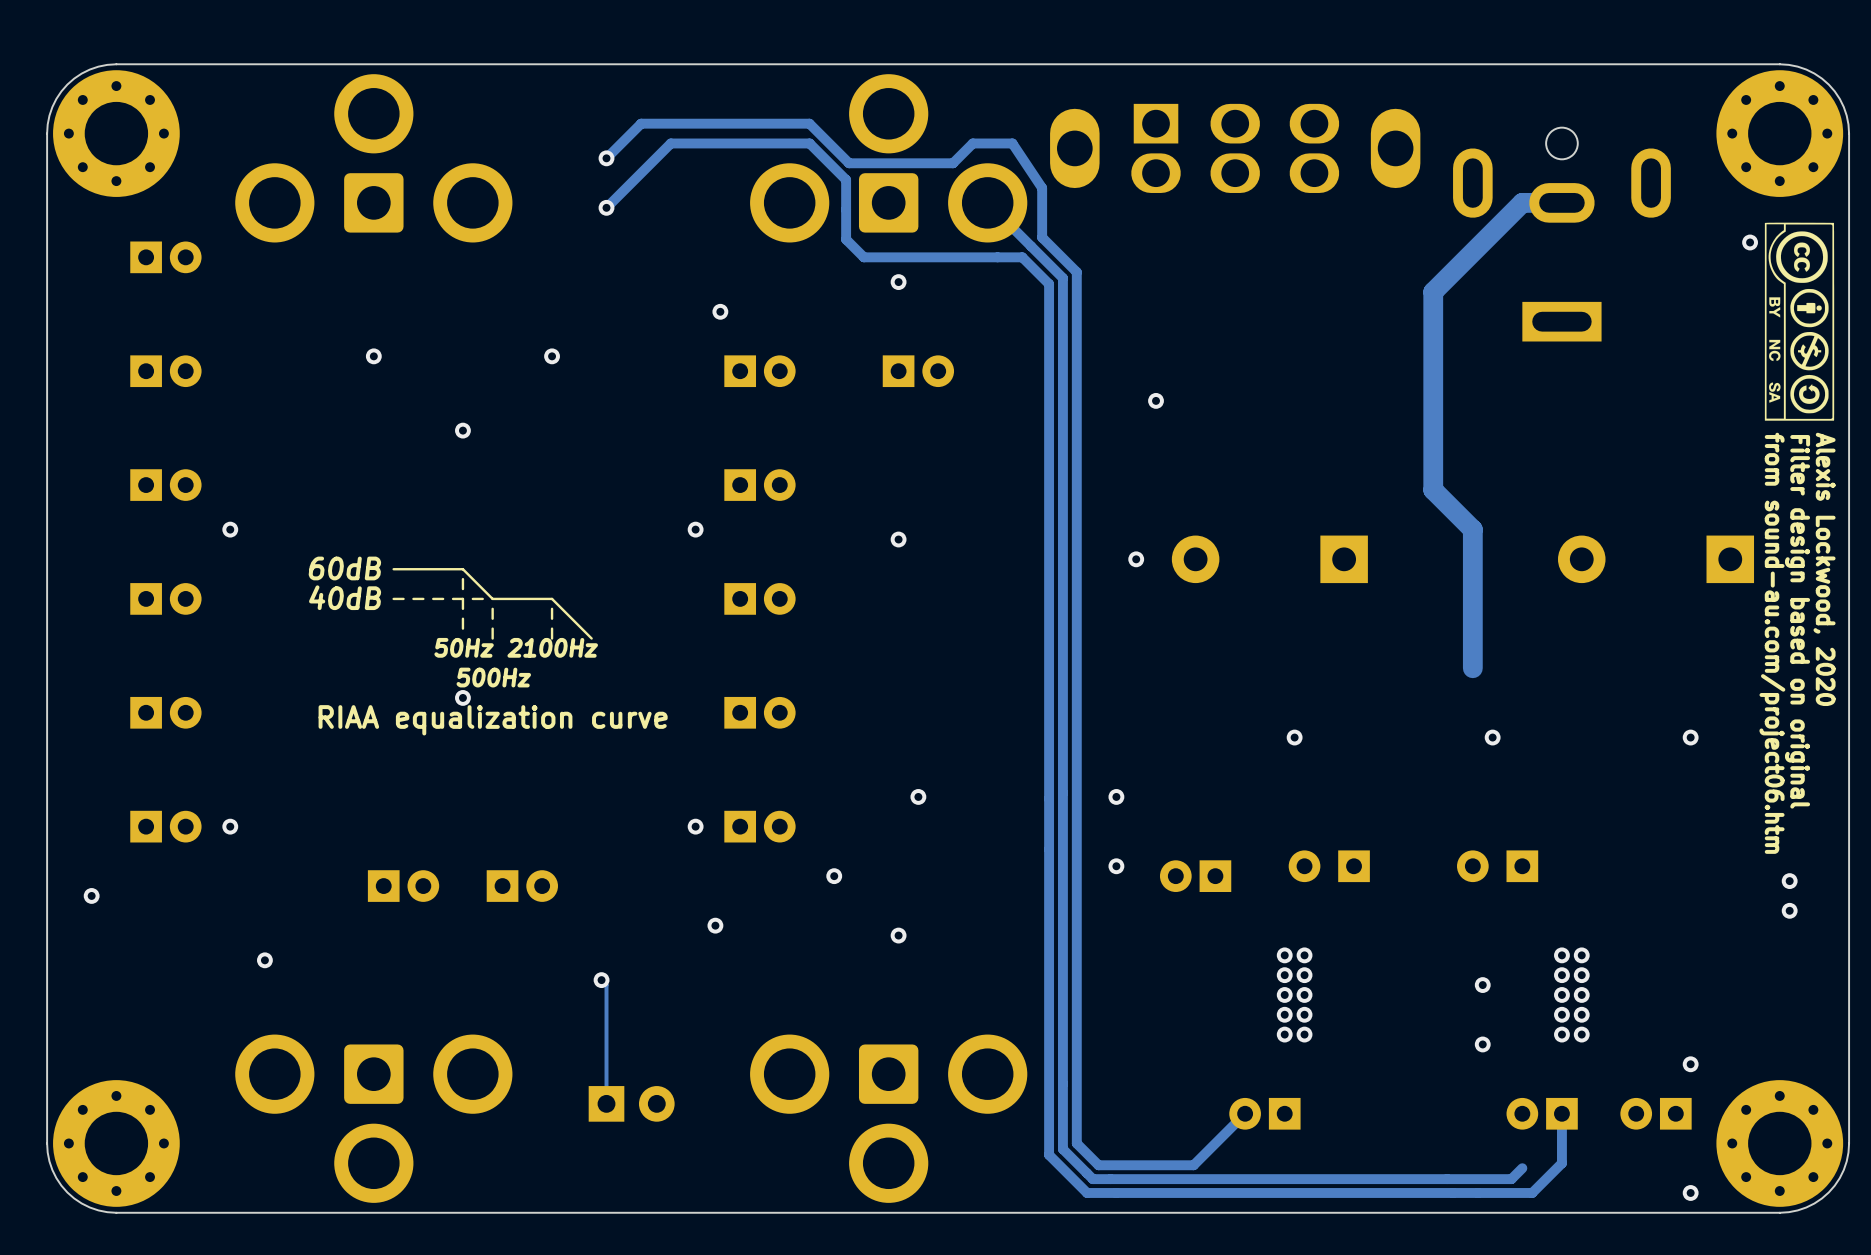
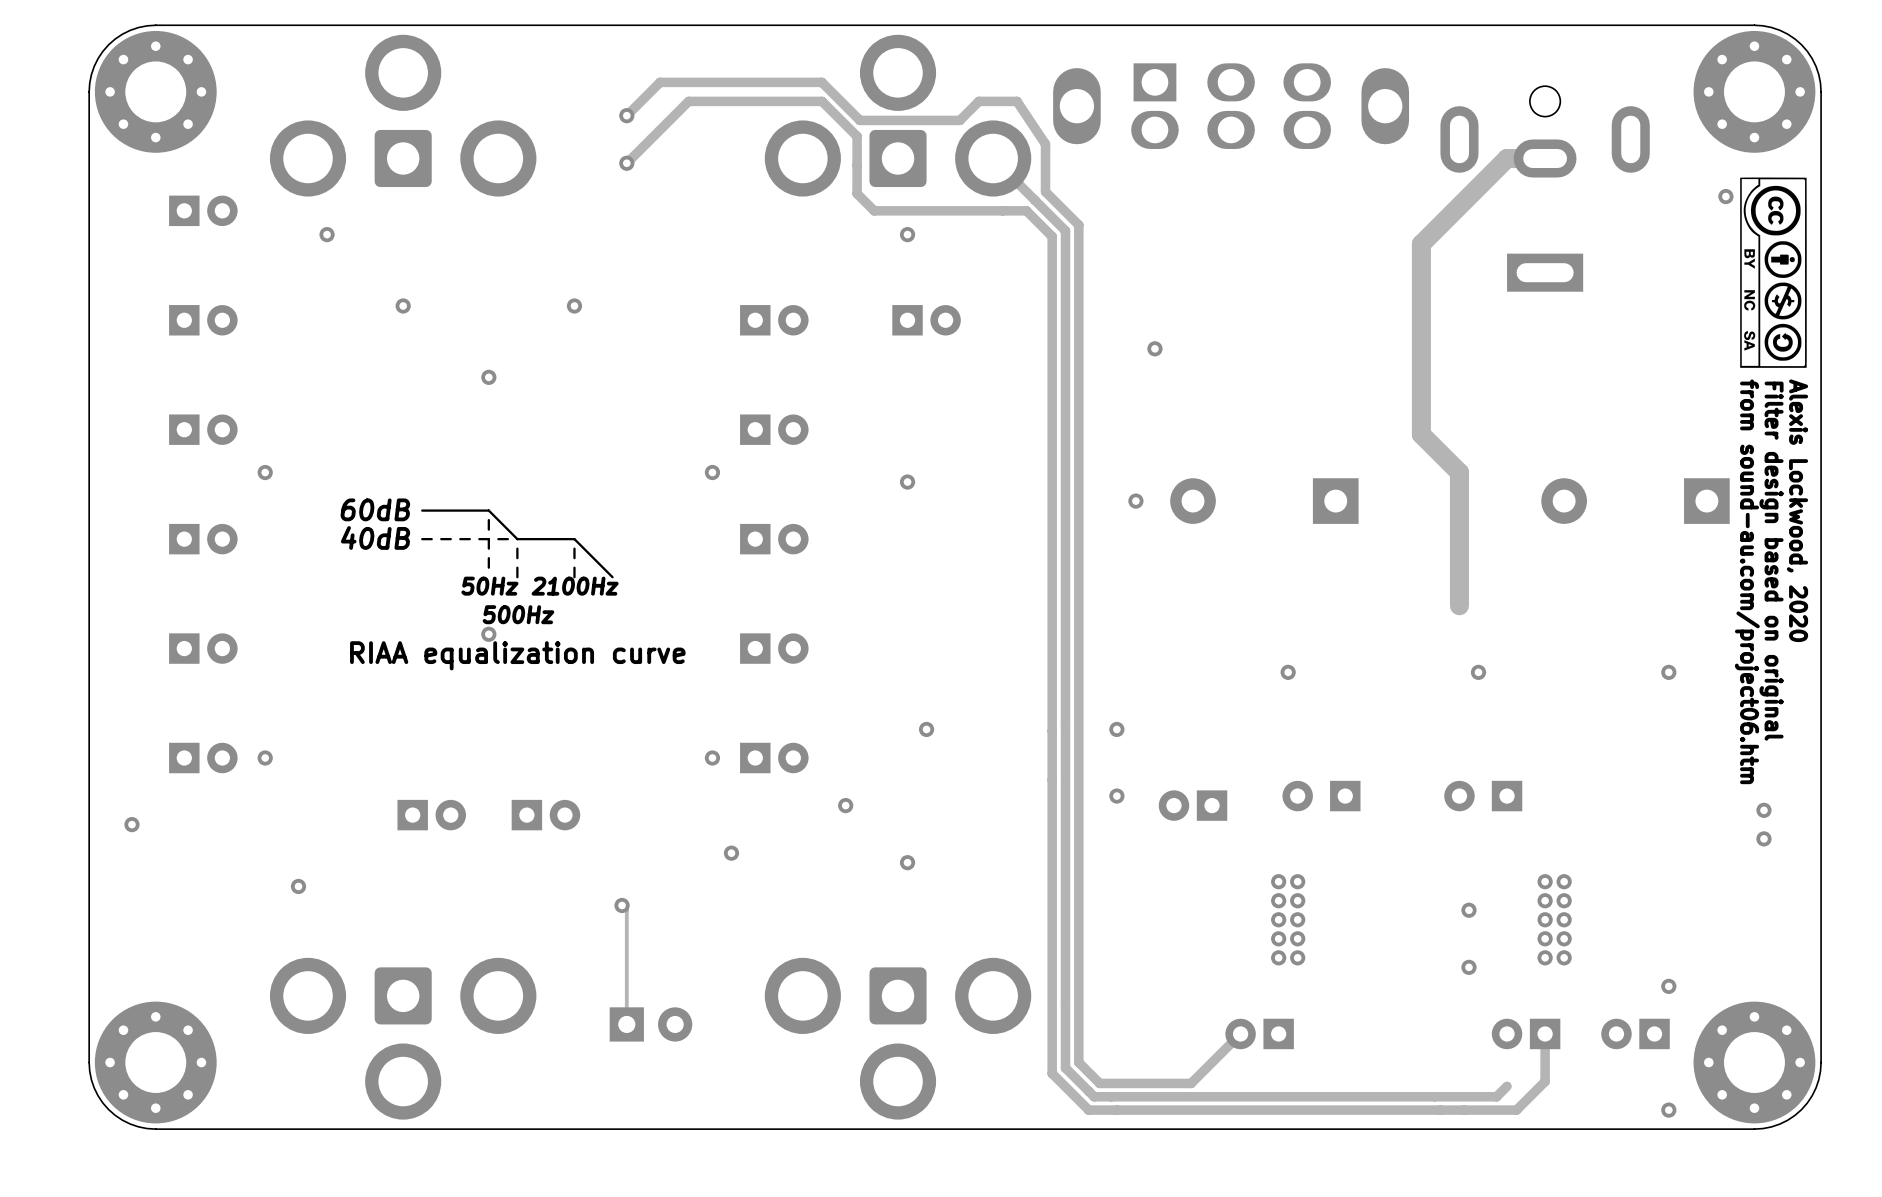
via: none -> (327, 234)
via: (720, 311) -> none

